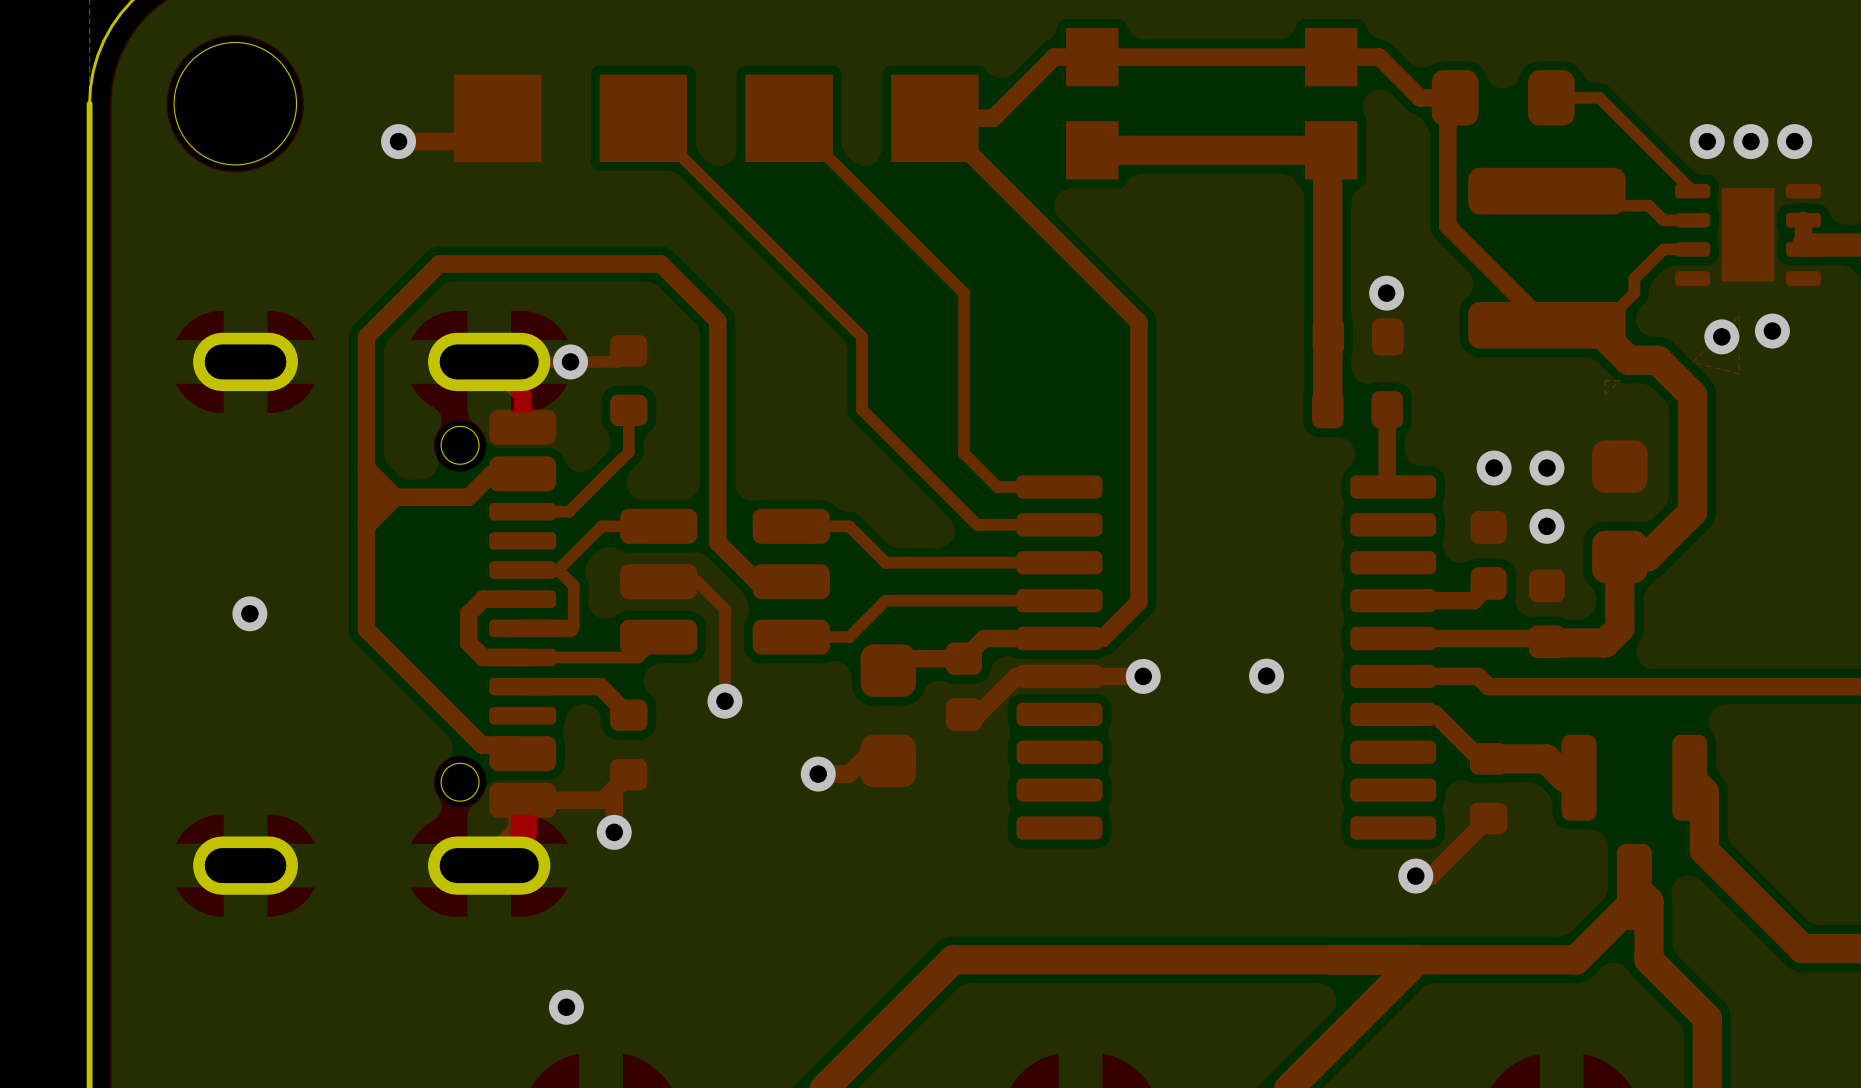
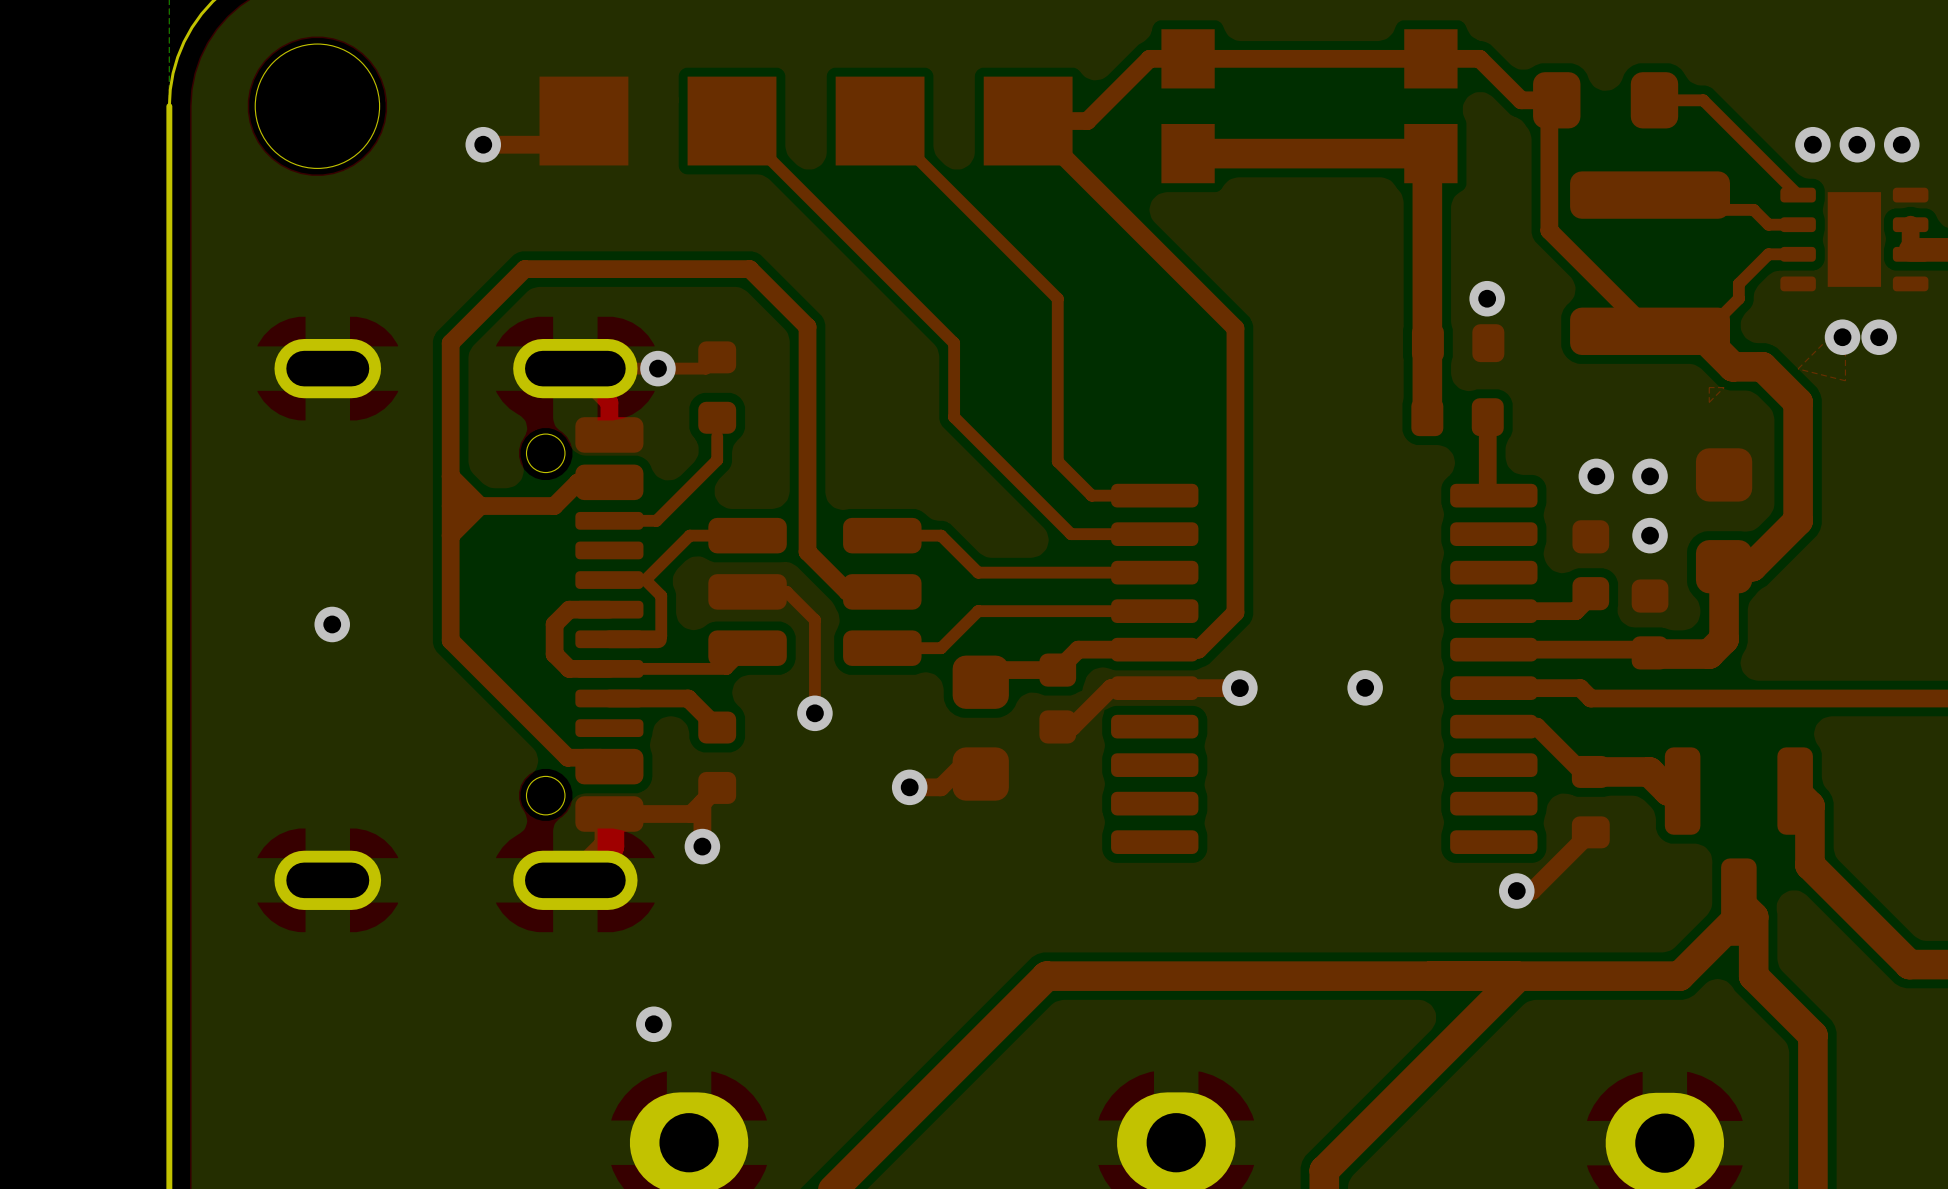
via position: (1721, 336) -> (1842, 337)

